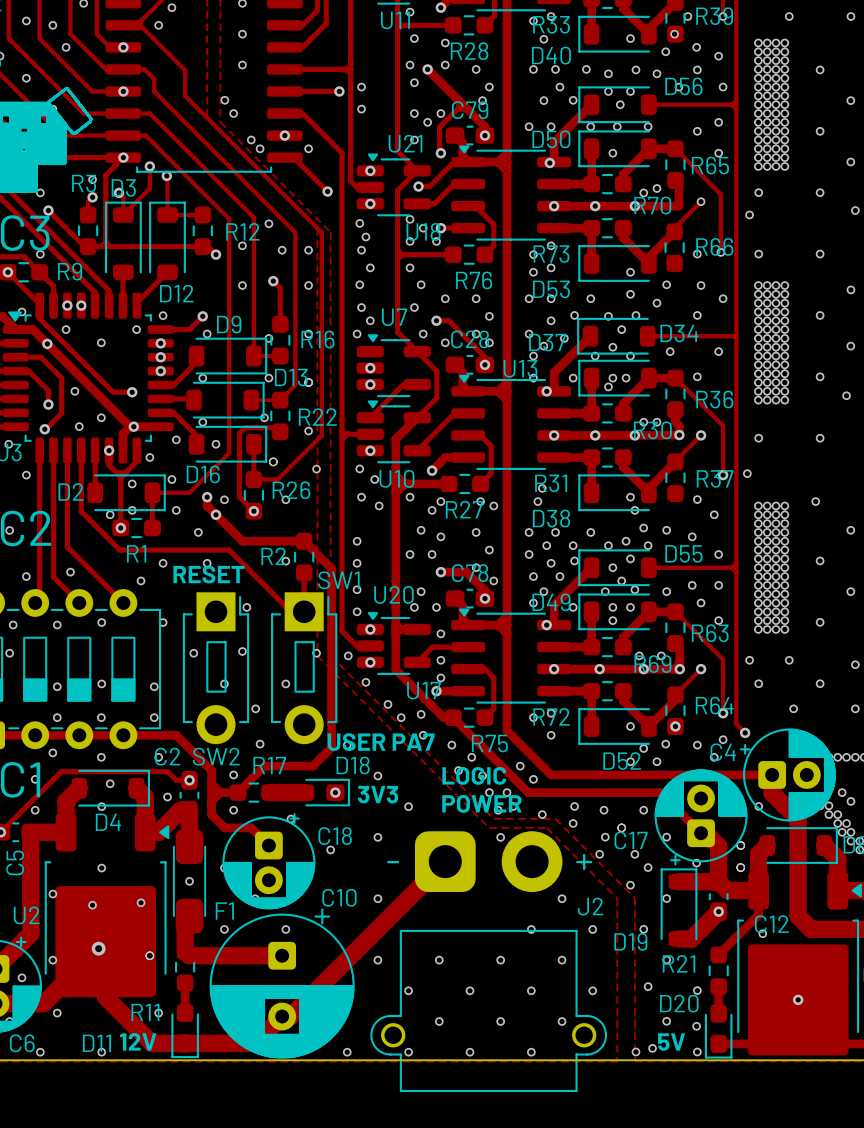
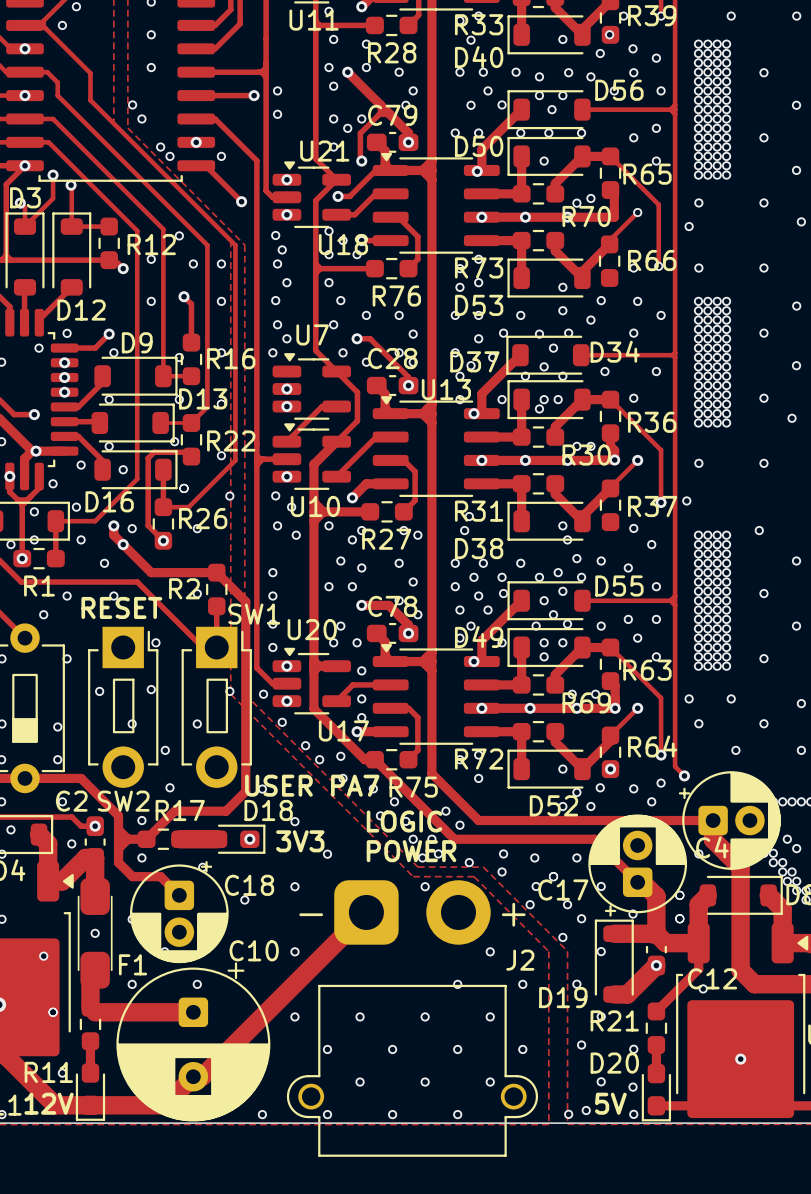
C4 name position: C4 (723, 752) -> C4 (712, 847)

